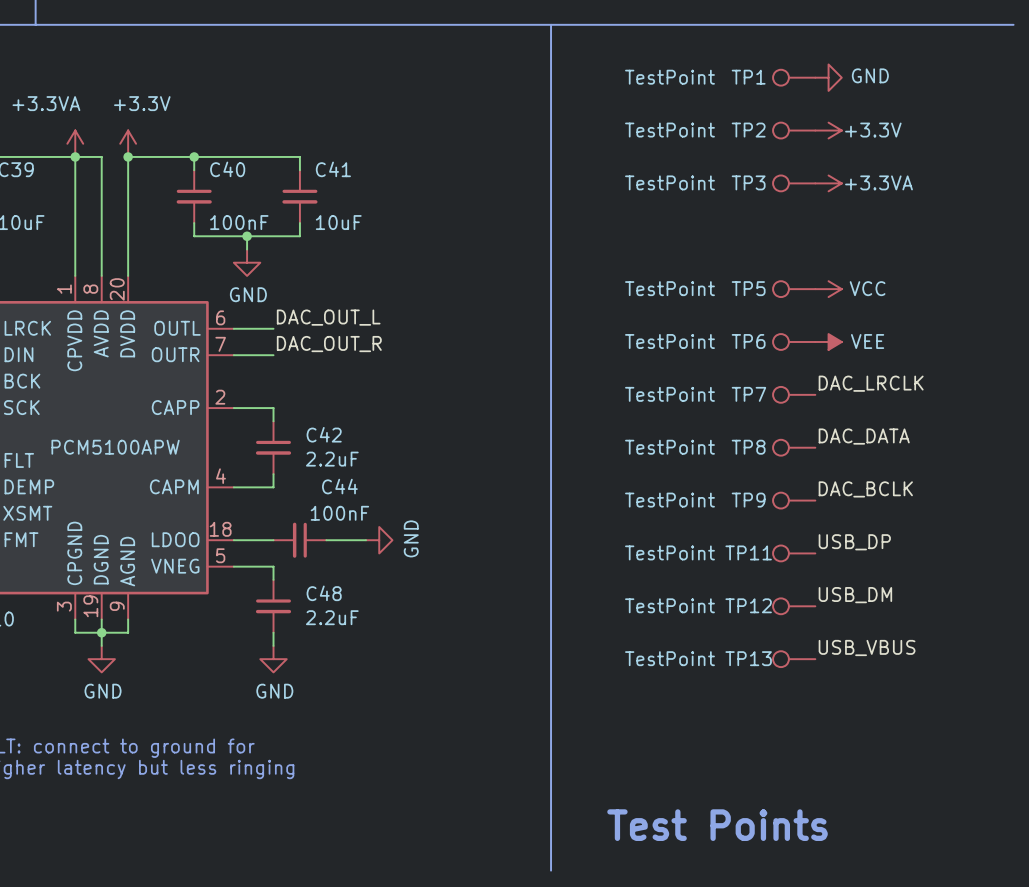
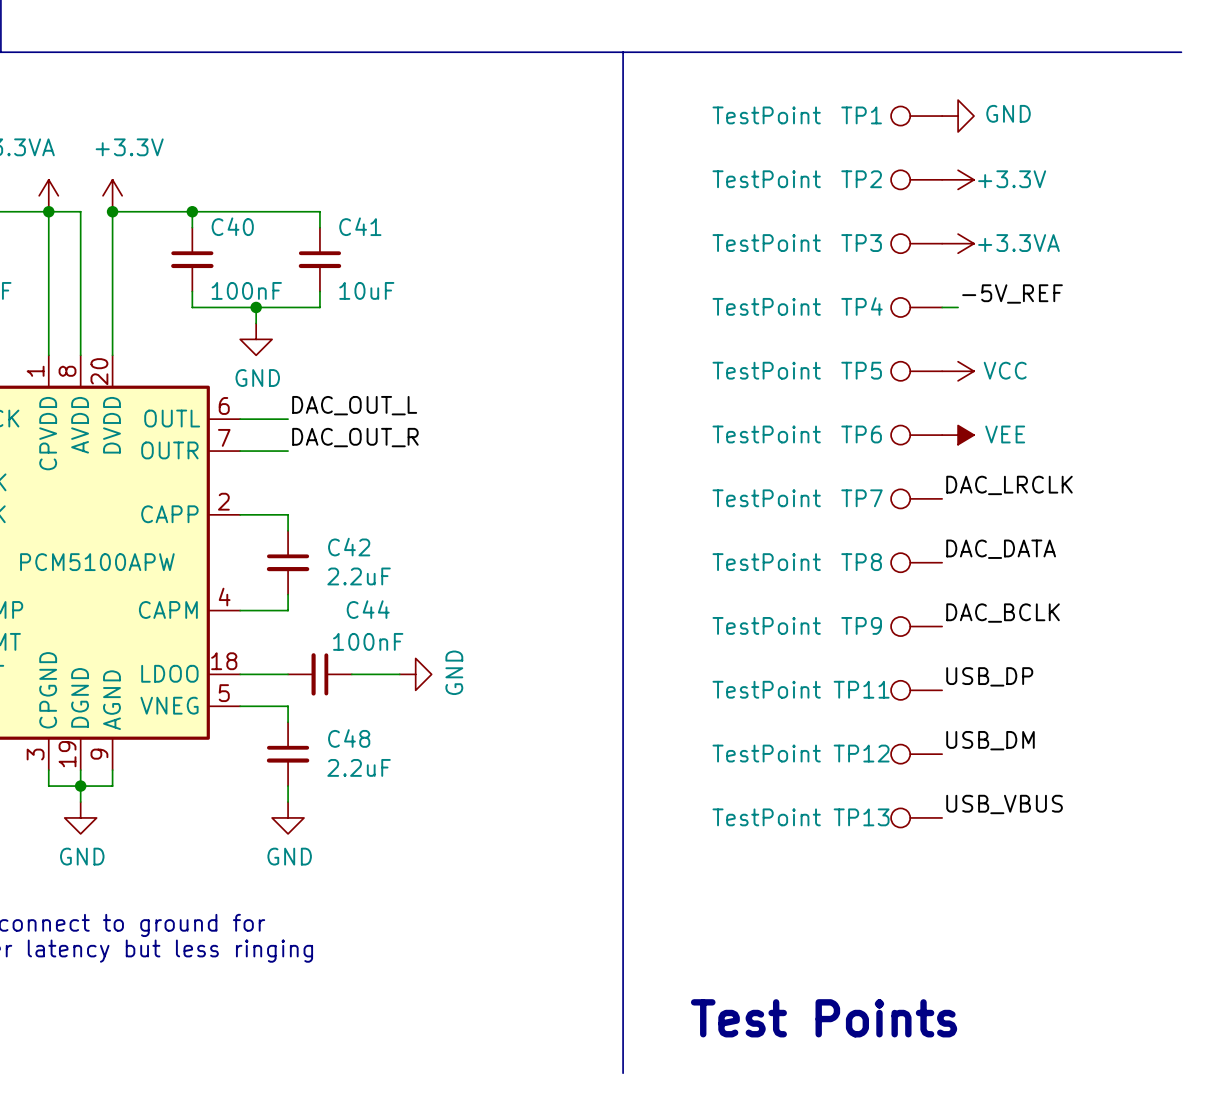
label: none -> -5V_REF (1012, 293)
TP4: none -> TestPoint (916, 307)
wire: none -> (942, 307) (958, 307)

